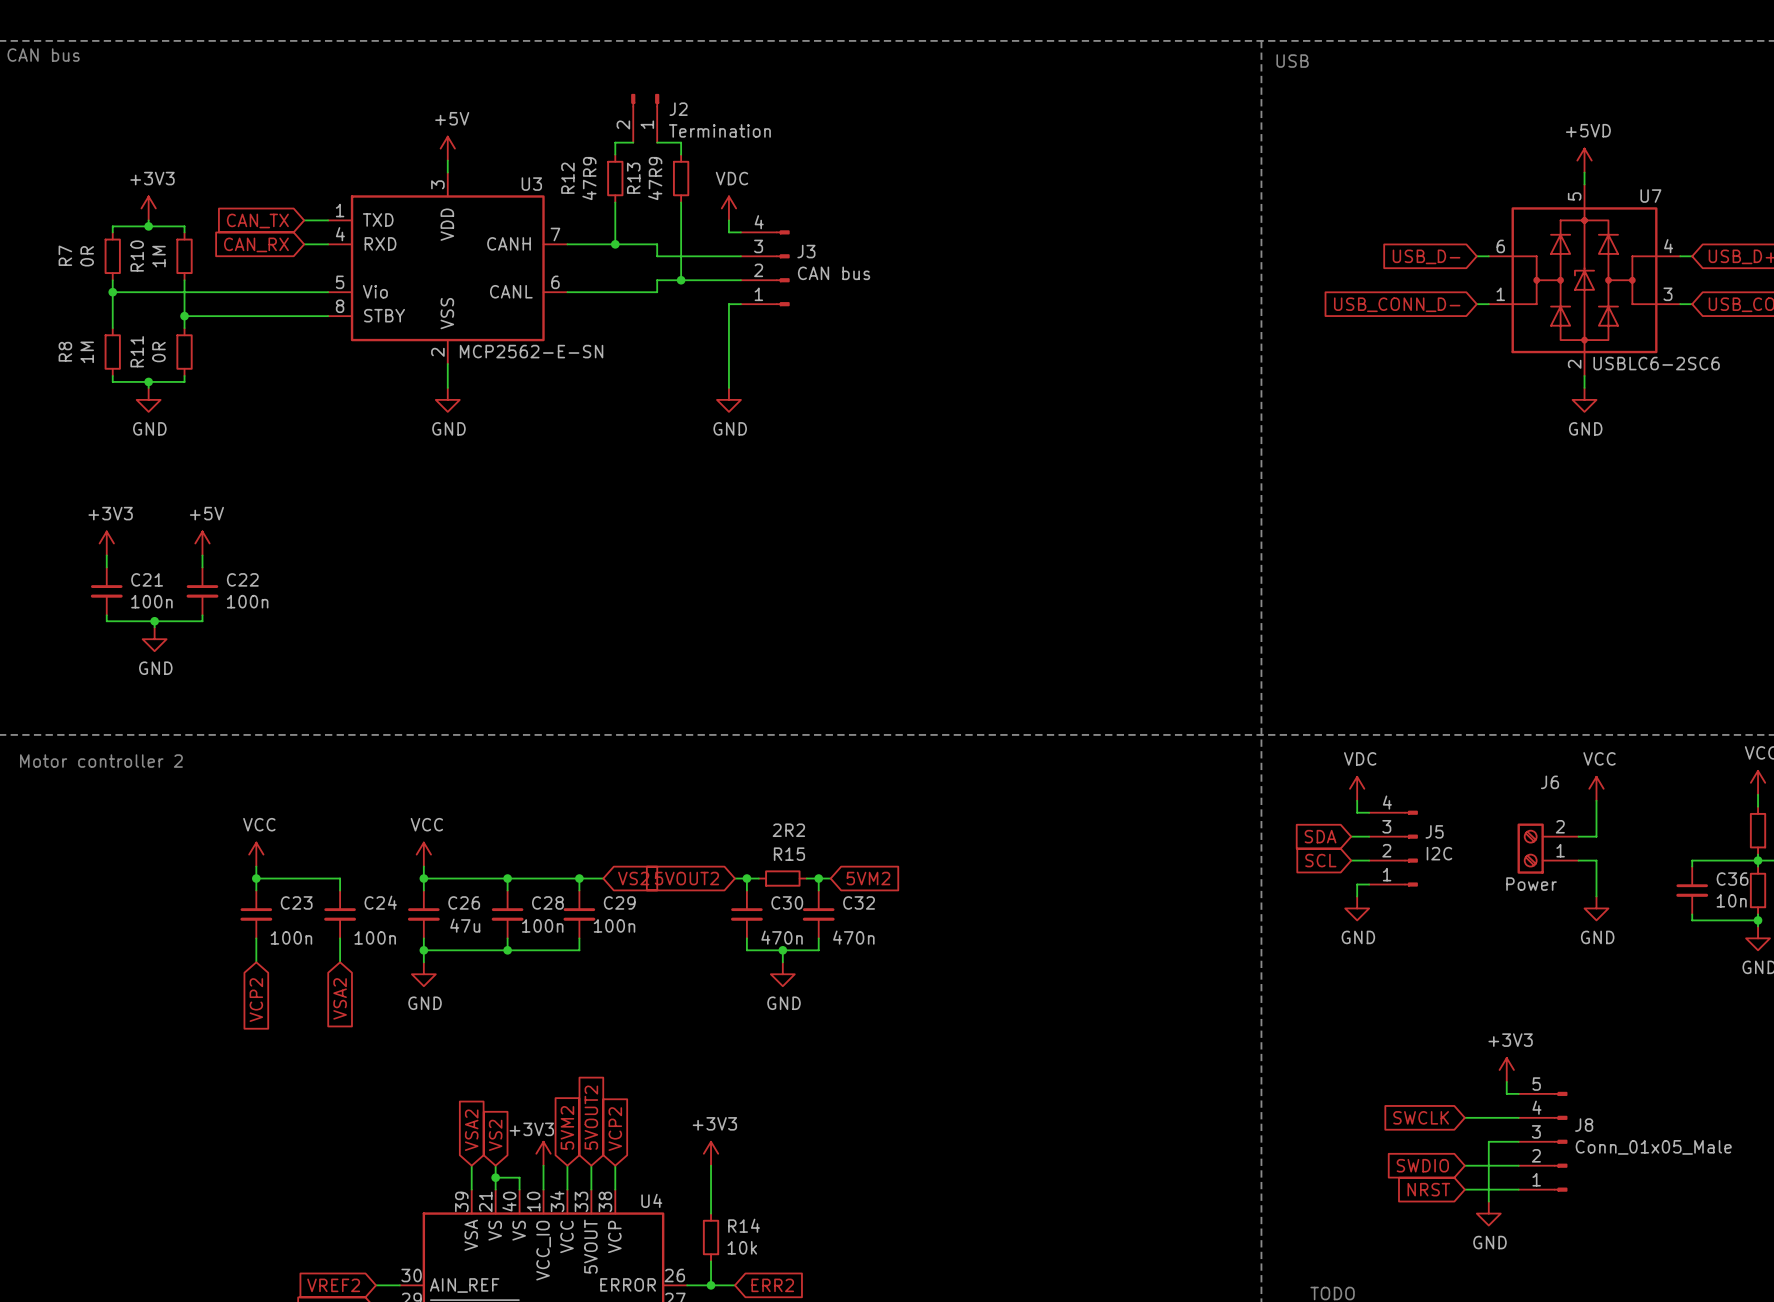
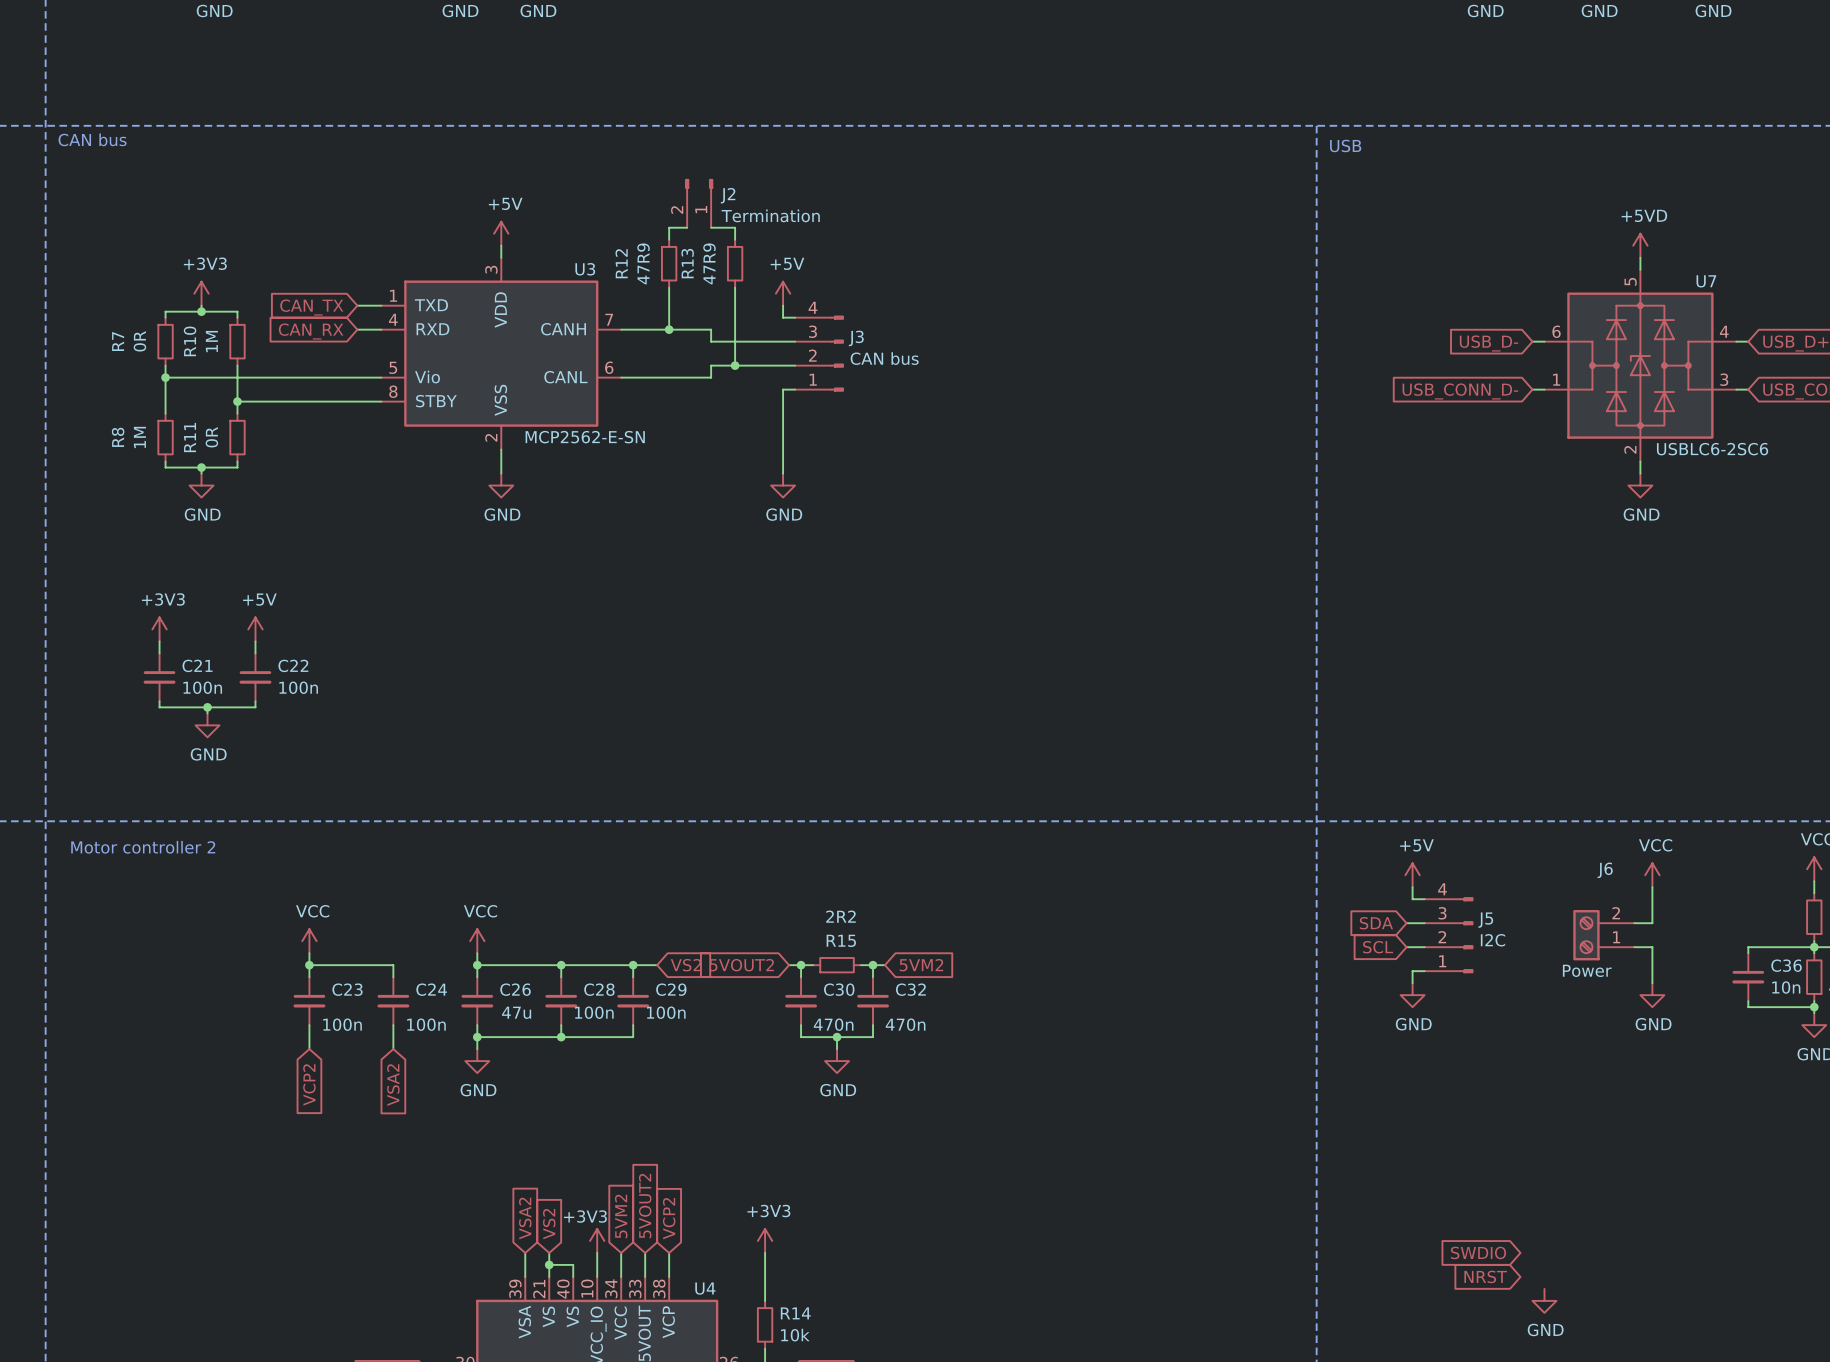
power symbol: VDC (728, 208) -> +5V (783, 293)
power symbol: VDC (1357, 788) -> +5V (1412, 875)
power symbol: +3V3 (1506, 1069) -> none
wire: (1506, 1081) (1506, 1093) (1518, 1093) -> none
global label: SWCLK (1421, 1117) -> none
wire: (1464, 1117) (1518, 1117) -> none
wire: (1518, 1141) (1488, 1141) (1488, 1201) -> none
J8: Conn_01x05_Male (1543, 1141) -> none
wire: (1464, 1165) (1518, 1165) -> none
wire: (1464, 1189) (1518, 1189) -> none

